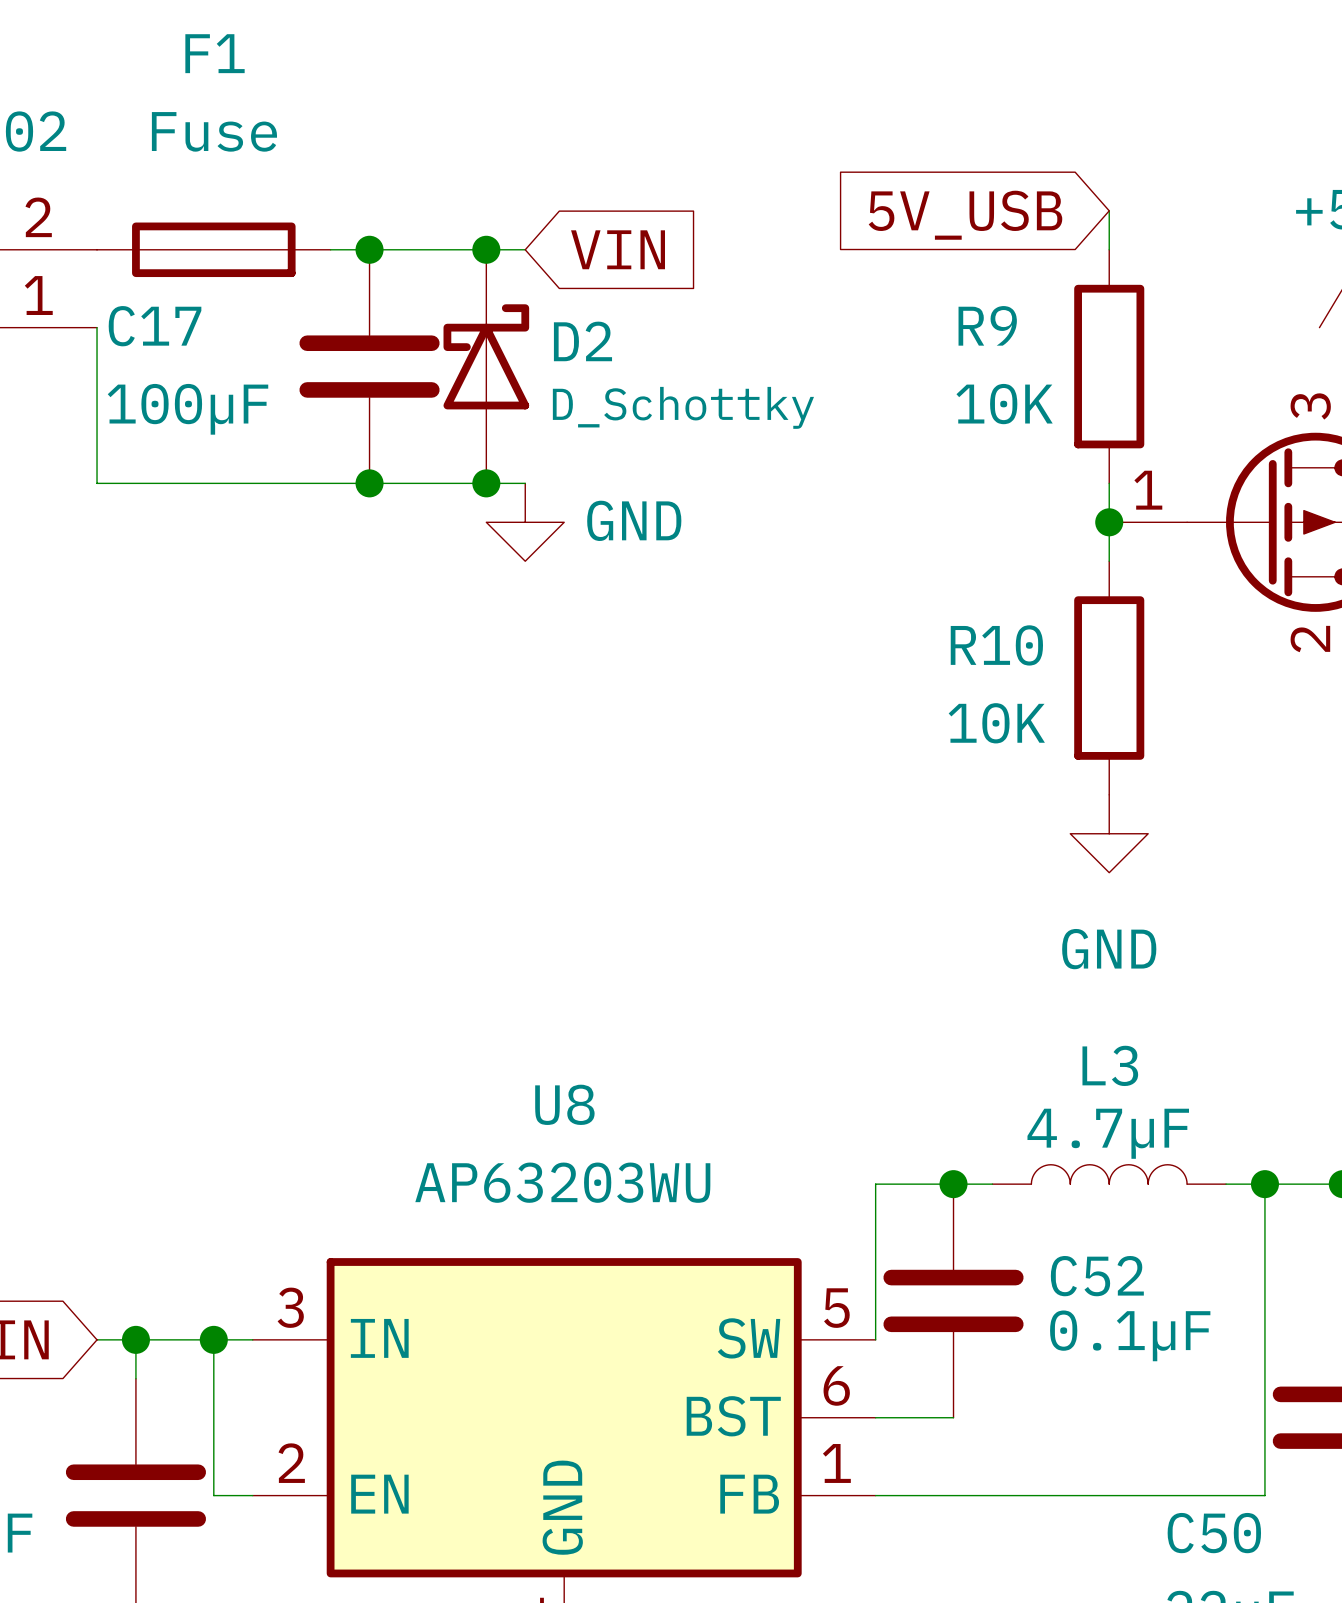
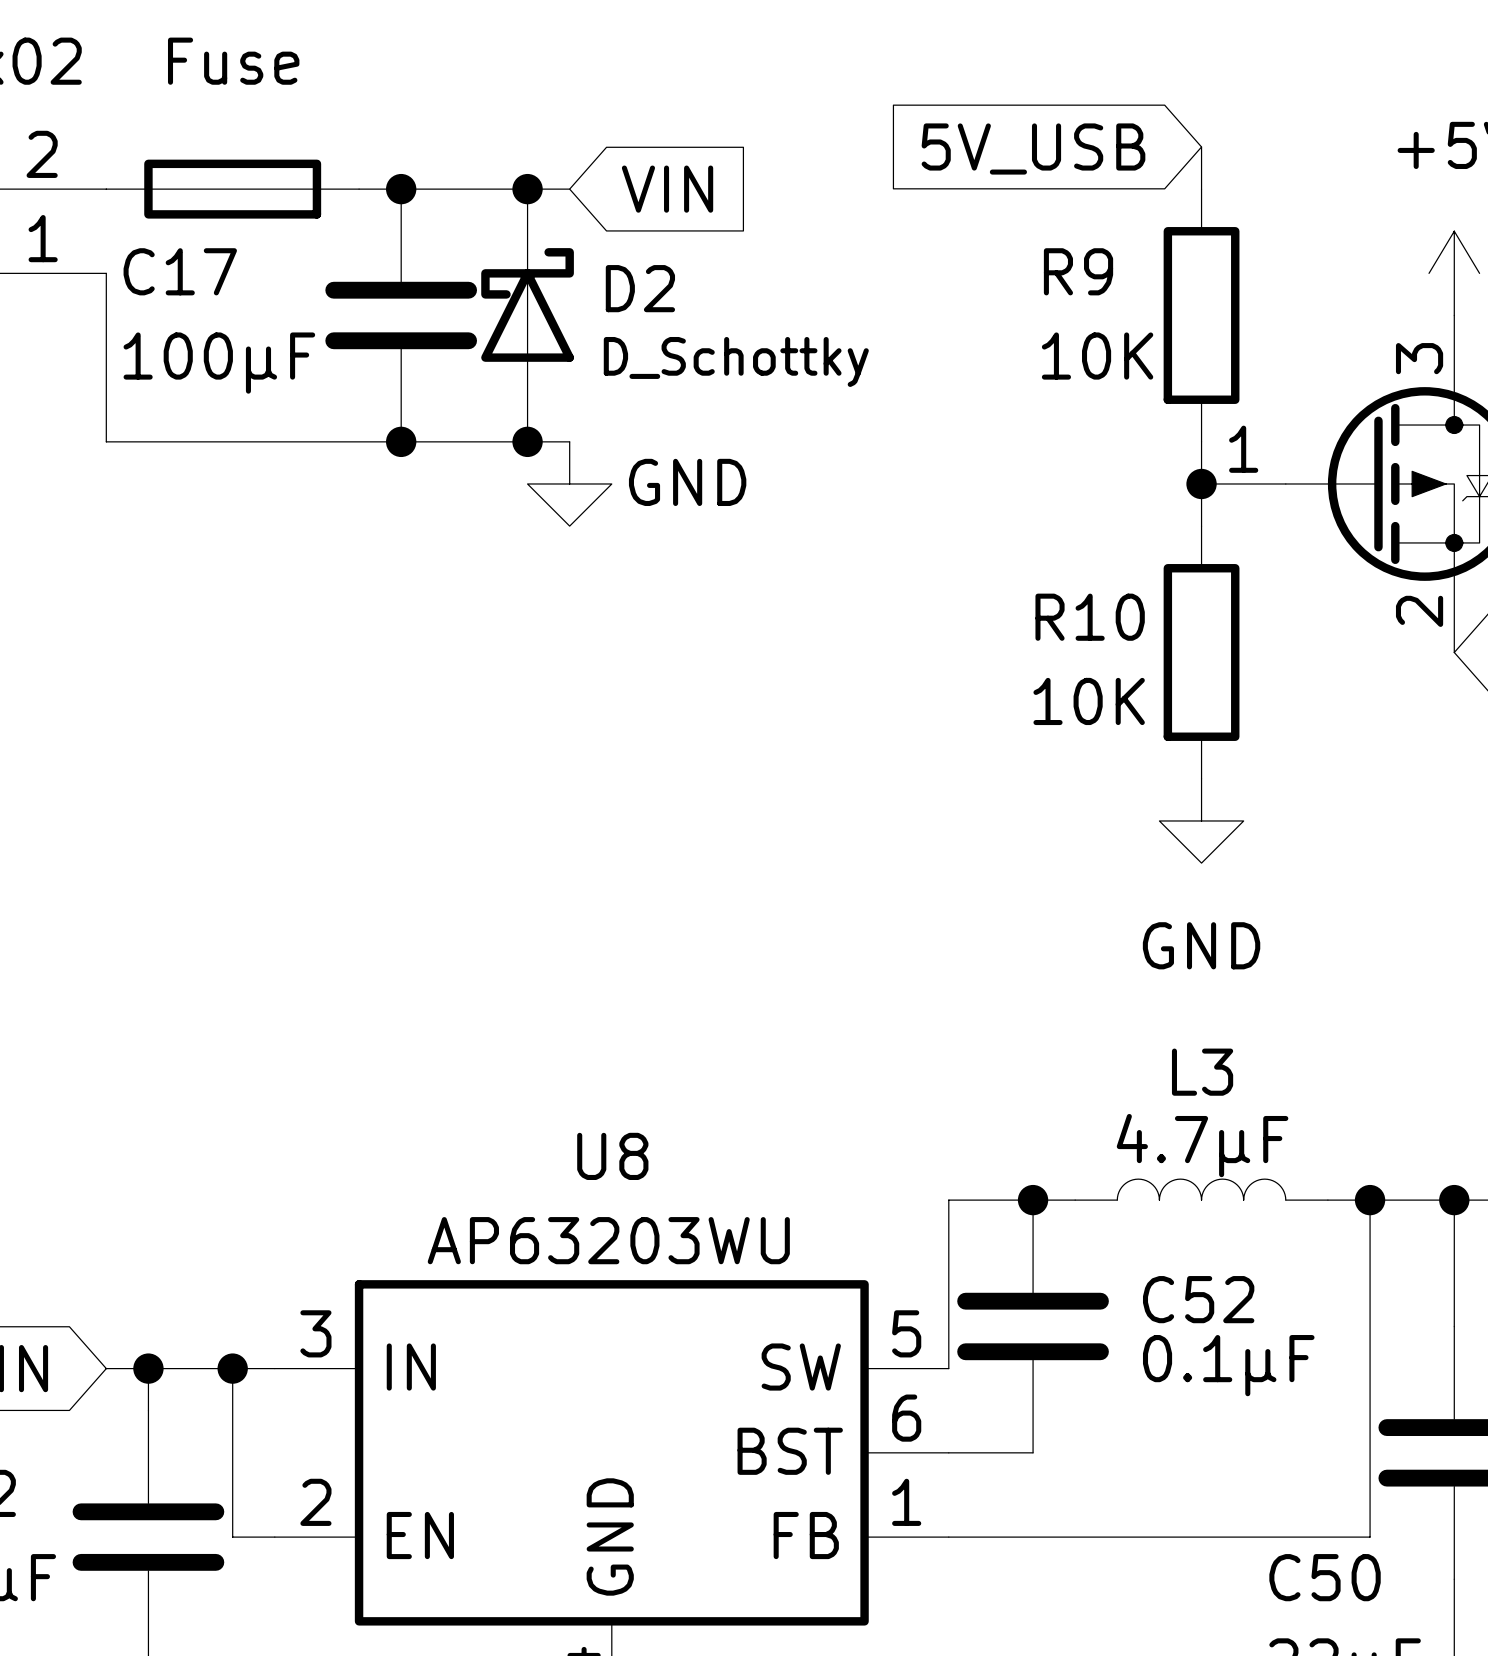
U8 name position: U8 (564, 1104) -> U8 (612, 1156)
U8 value position: AP63203WU (562, 1182) -> AP63203WU (608, 1240)

